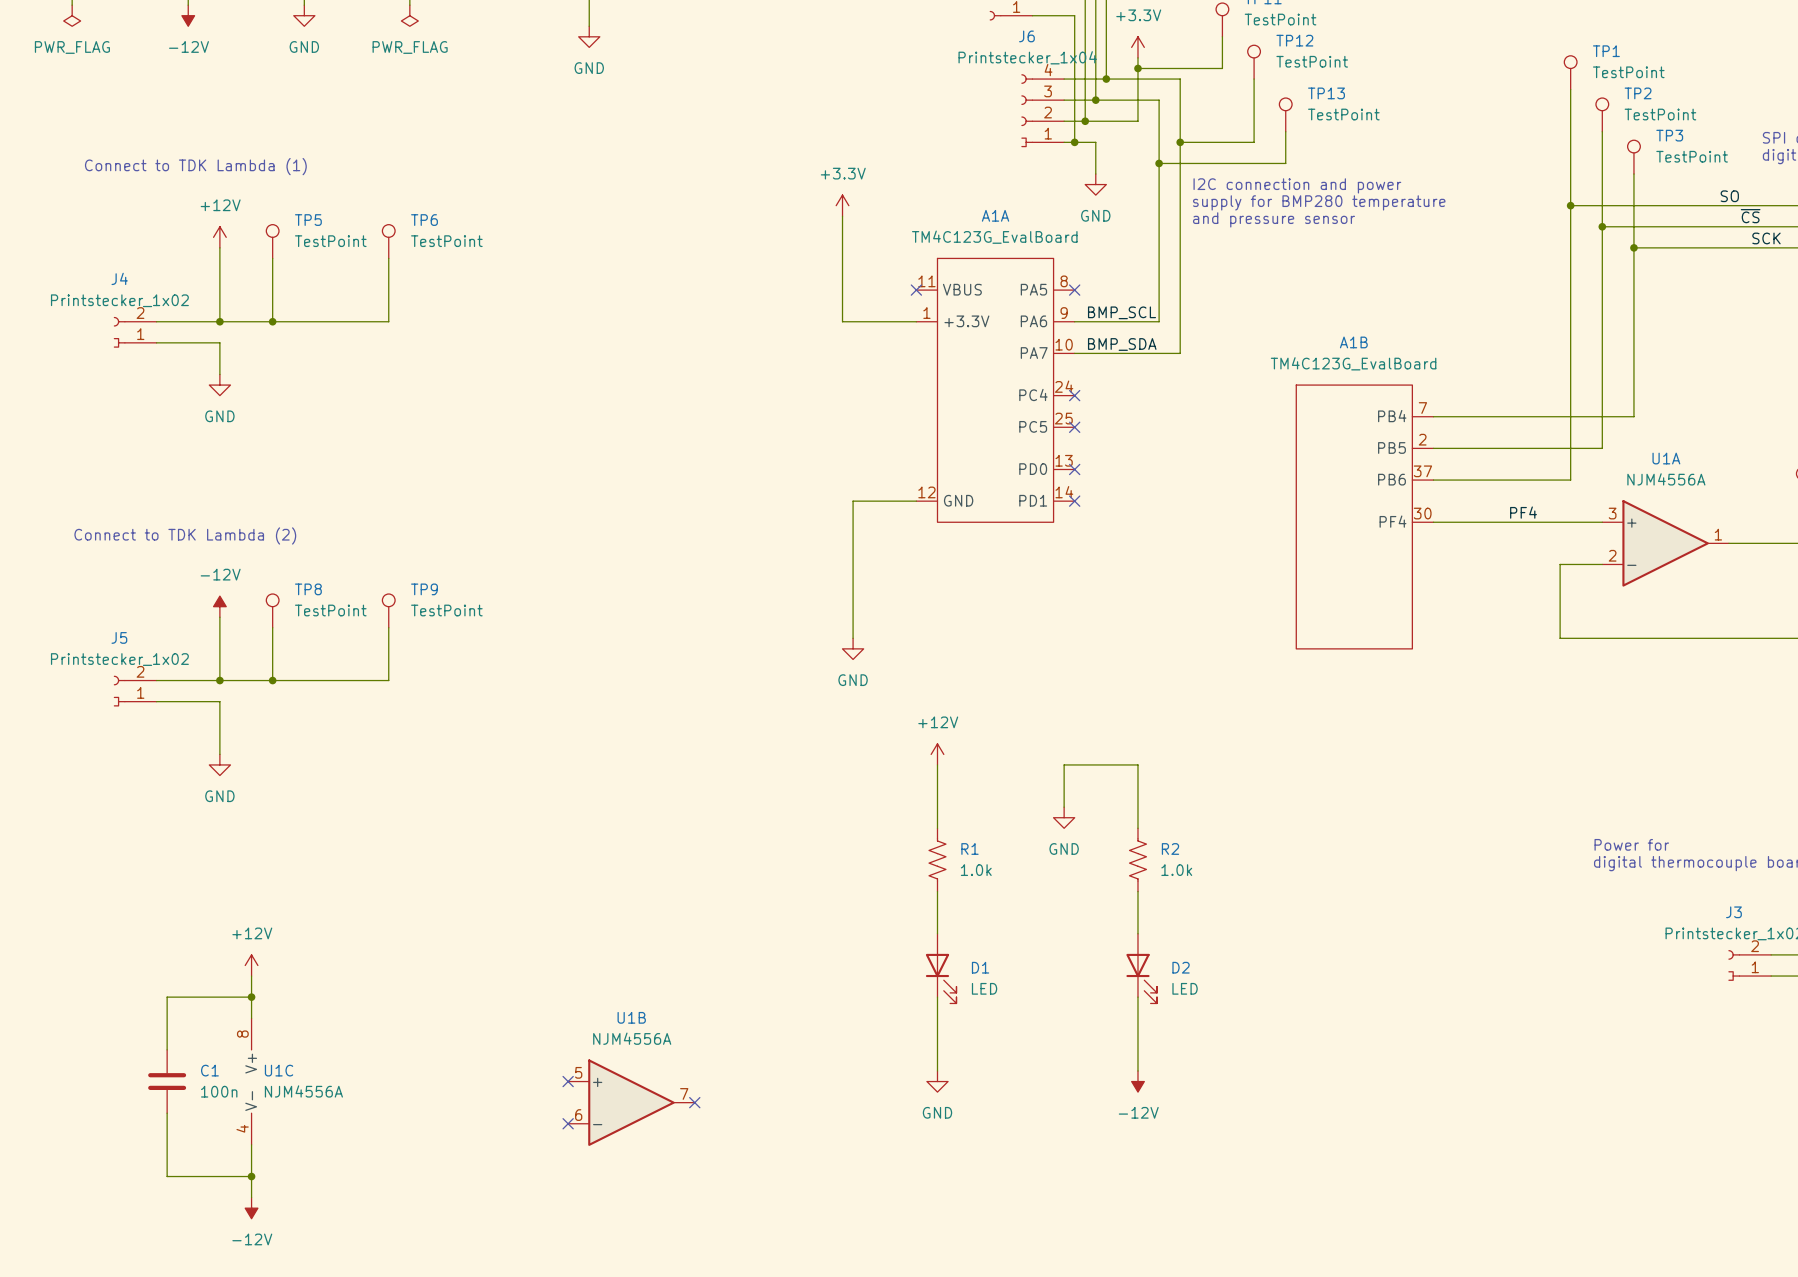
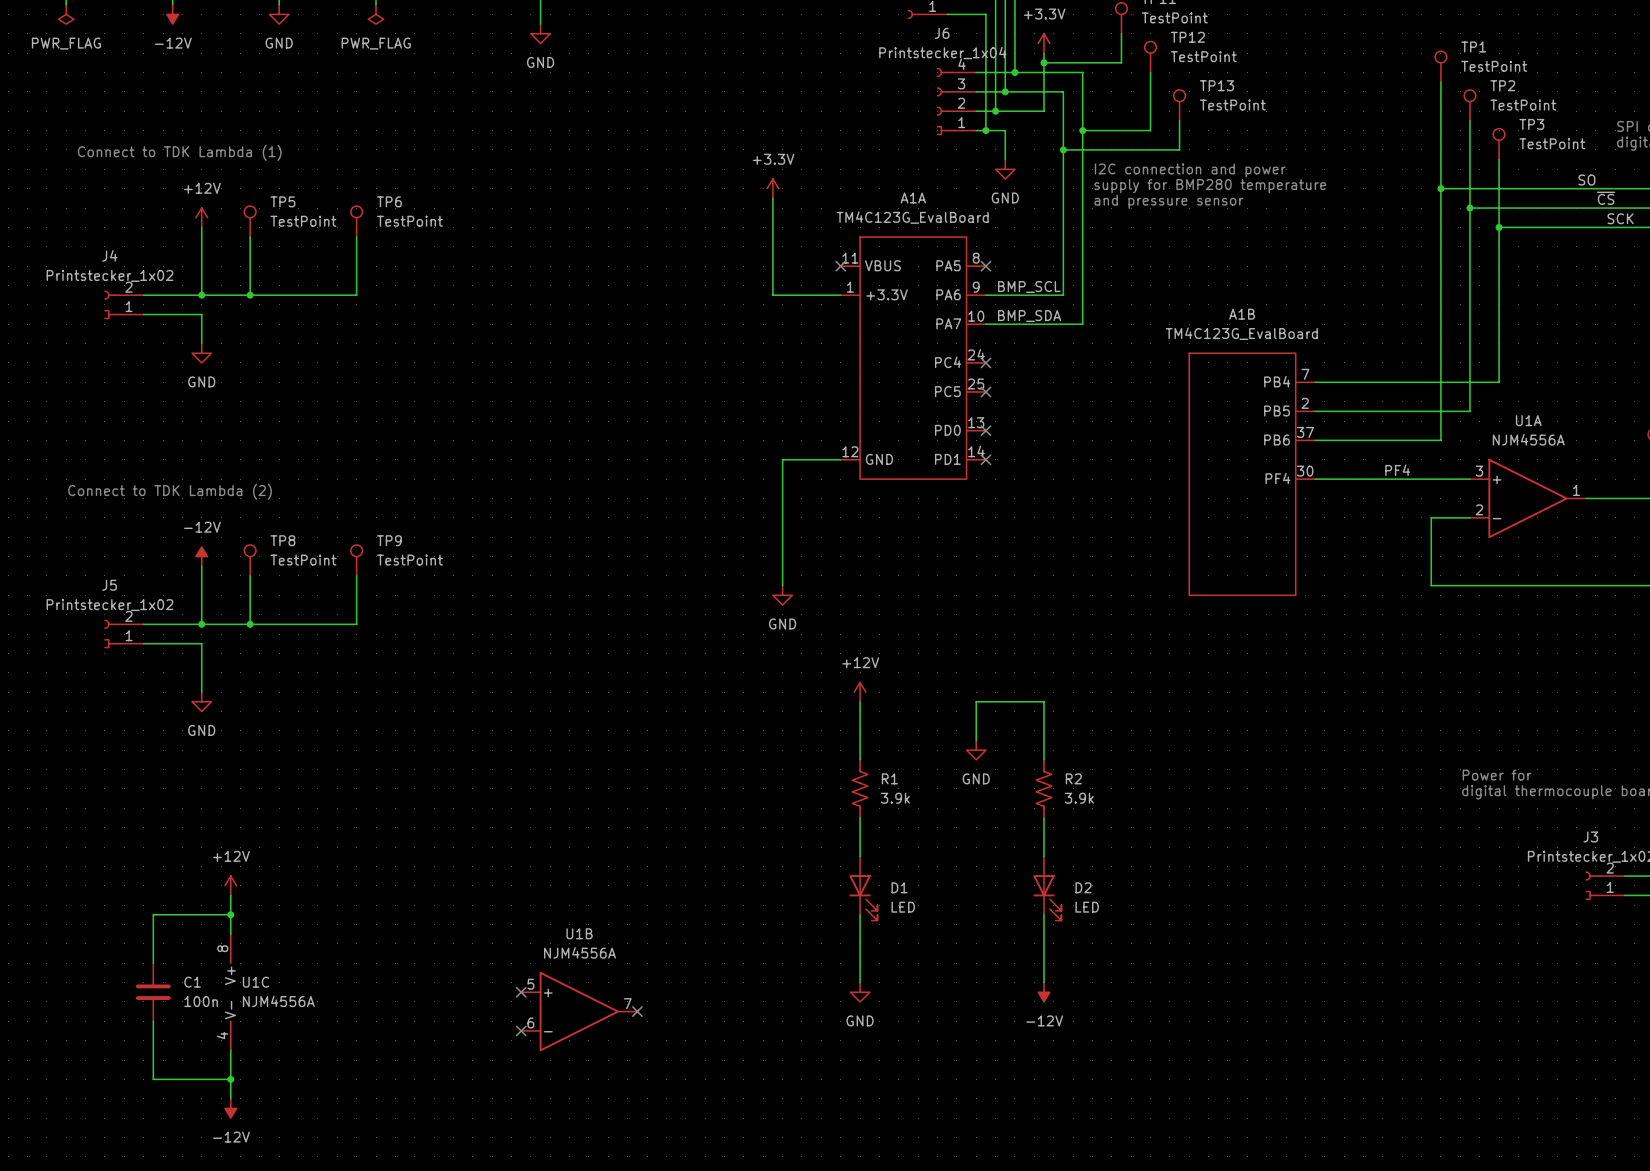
R1 value: 1.0k (976, 870) -> 3.9k (895, 798)
R2 value: 1.0k (1176, 870) -> 3.9k (1079, 798)

